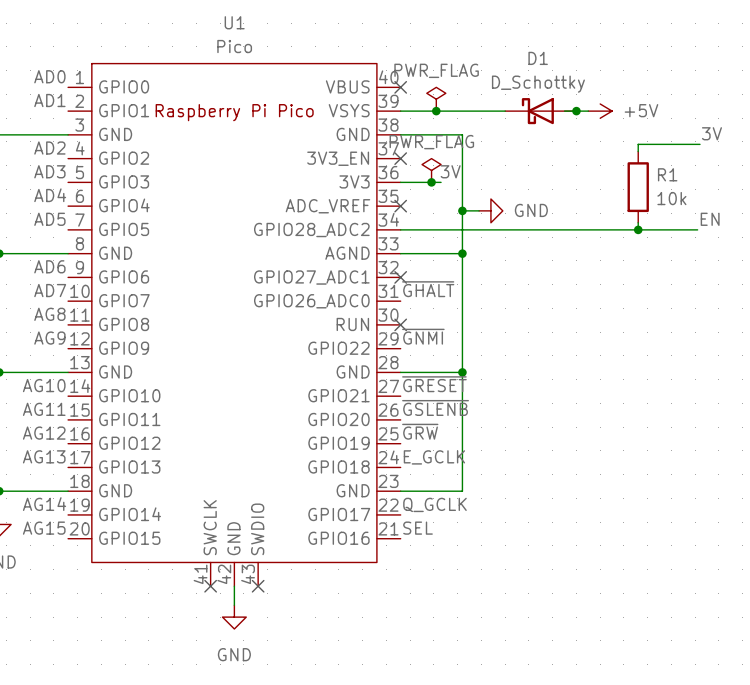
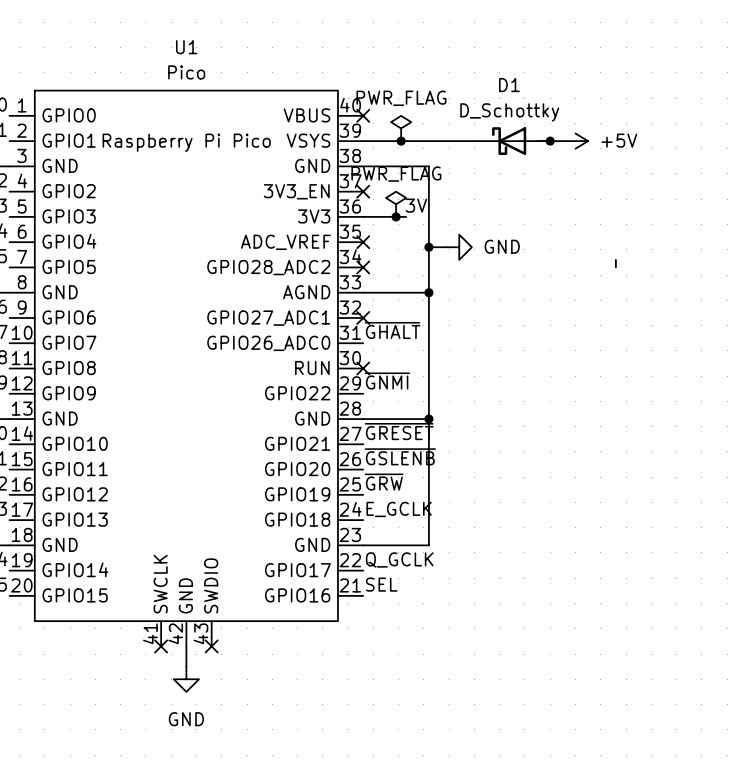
label: 3V (711, 133) -> none
wire: (699, 144) (638, 144) (638, 151) -> none
R1: 10k (638, 187) -> none
label: EN (710, 219) -> none
wire: (400, 229) (697, 229) -> none
no-connect mark: none -> (363, 267)
junction: (638, 229) -> none

